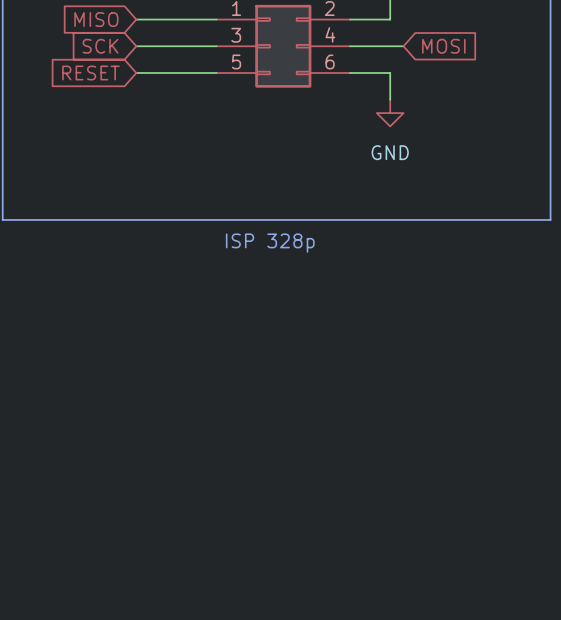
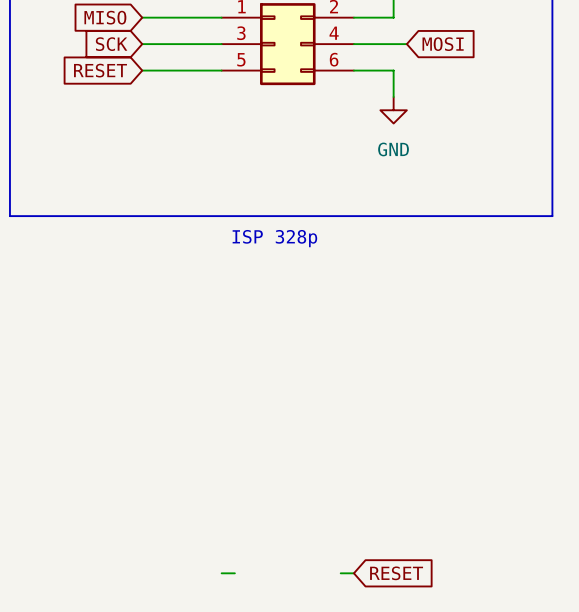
wire: none -> (221, 573) (234, 573)
wire: none -> (340, 573) (353, 573)
global label: none -> RESET (396, 573)

